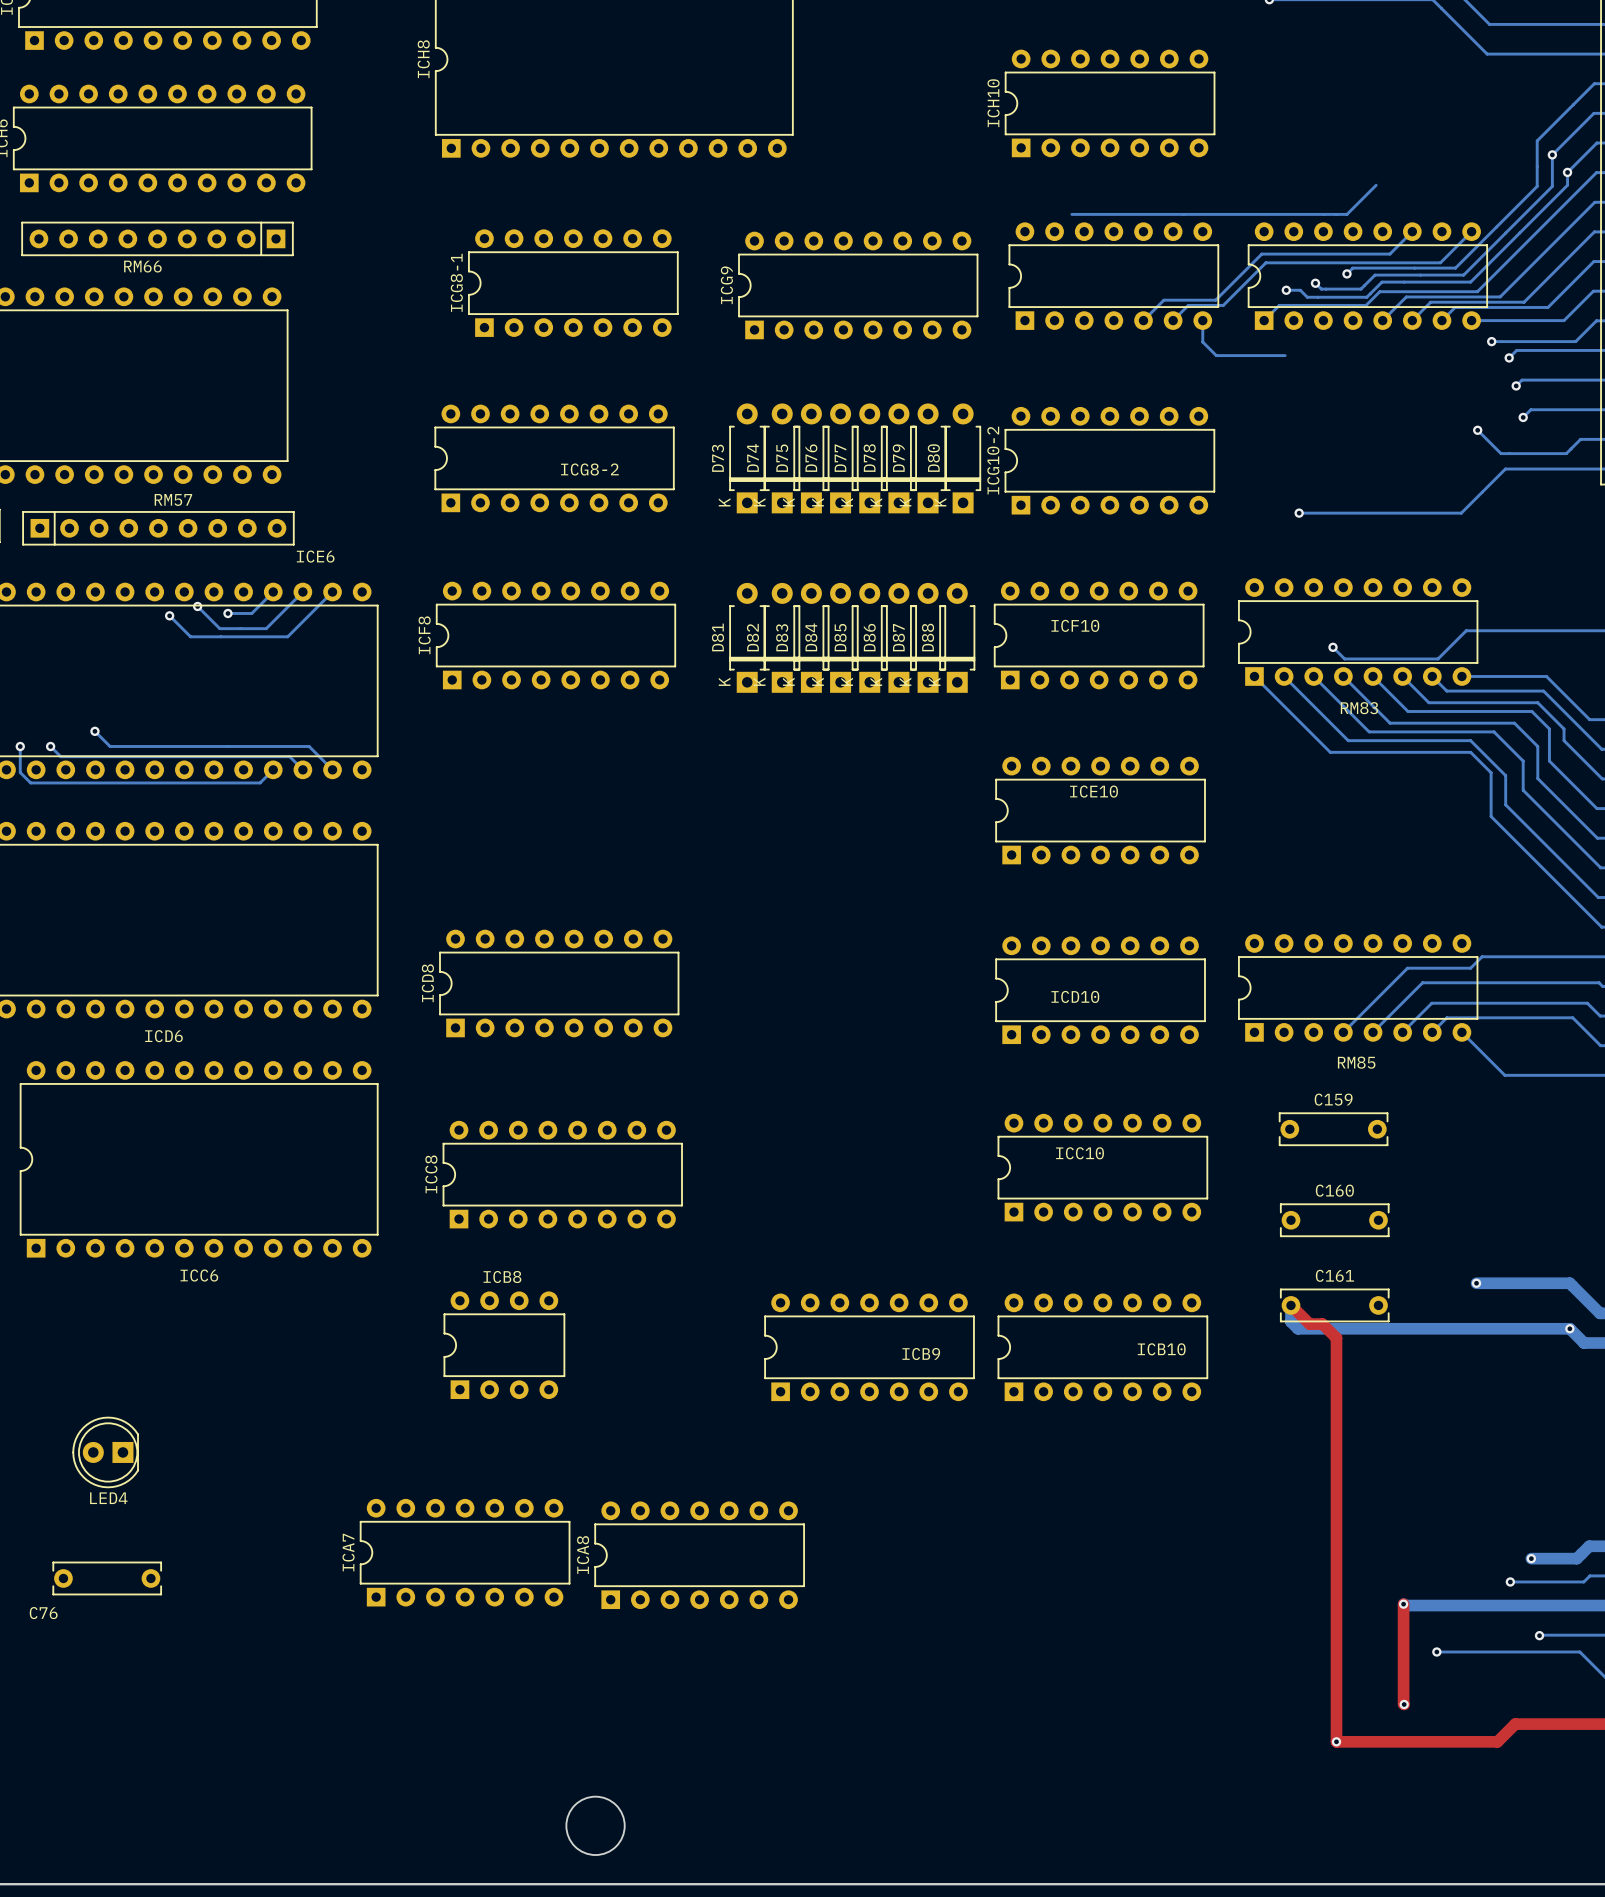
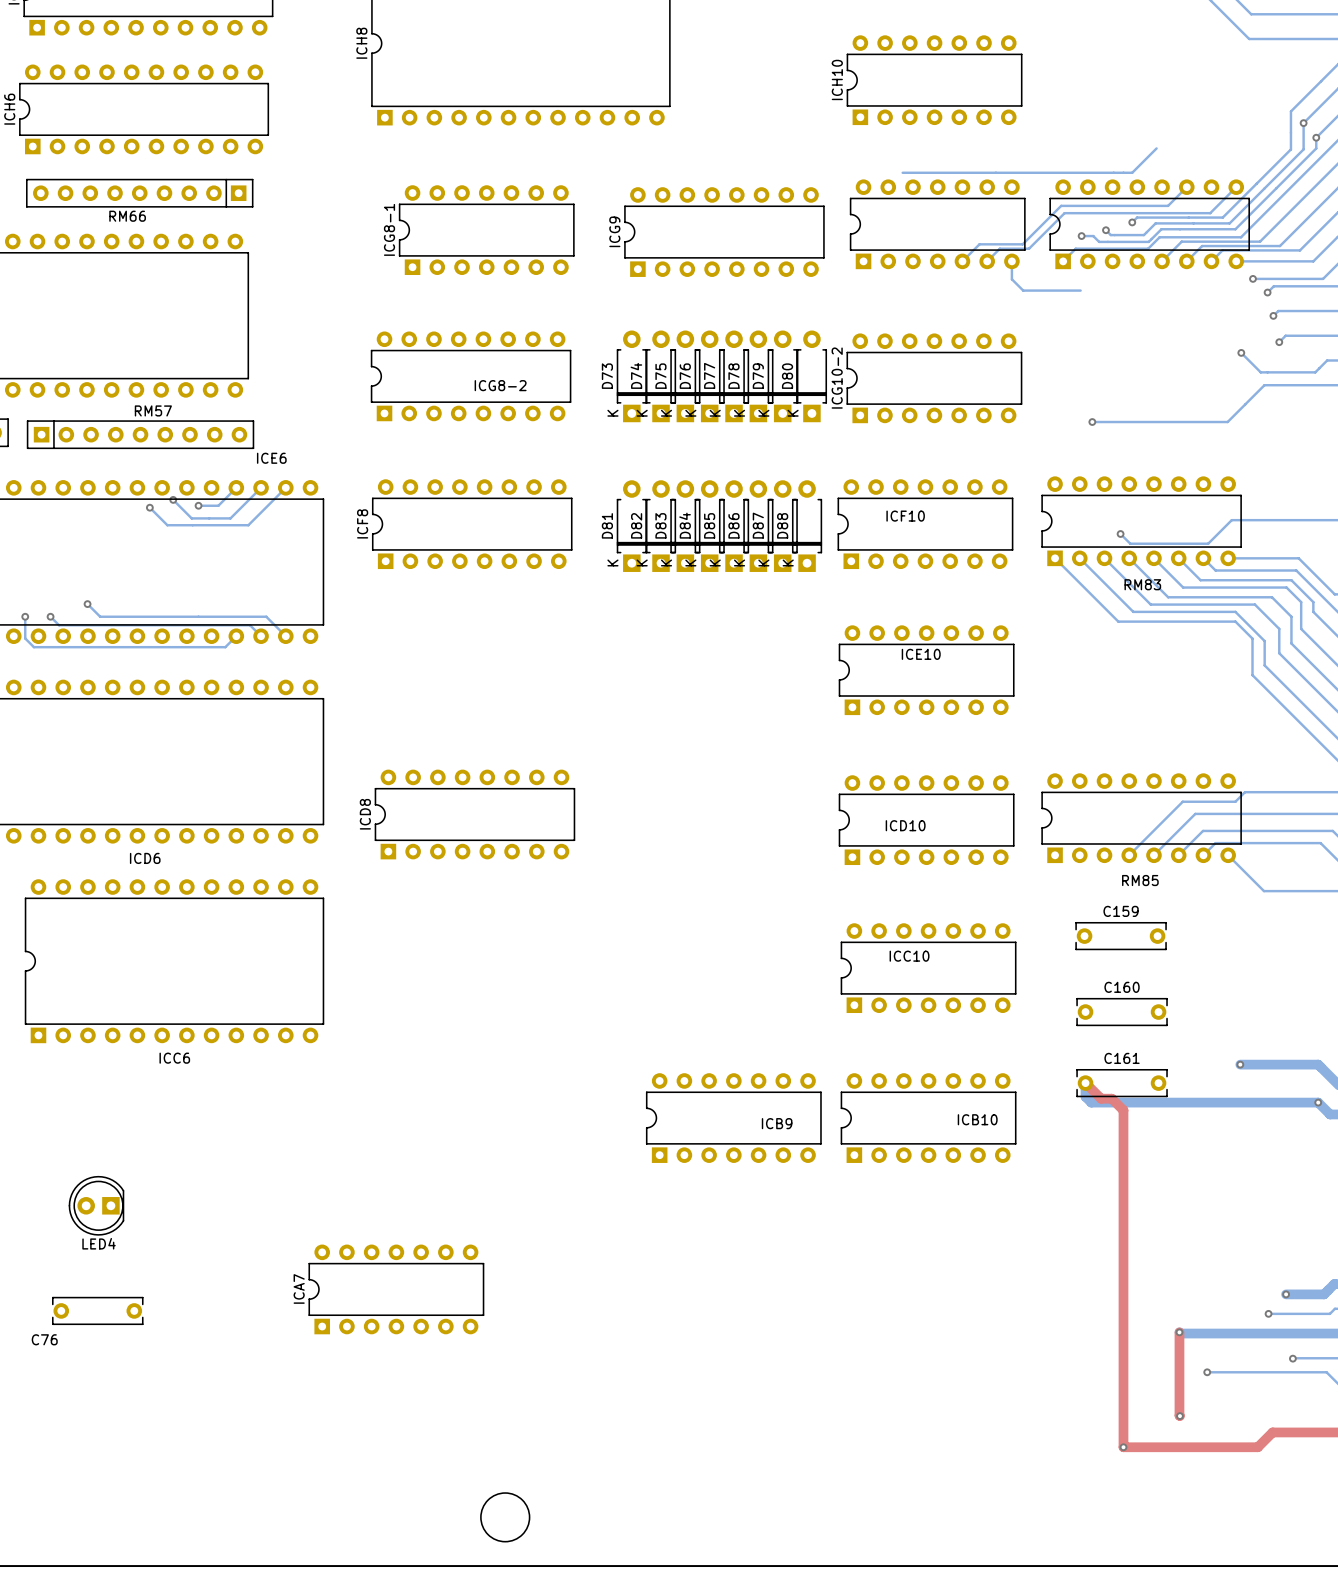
ICC8: (562, 1174) -> none
ICB8: (504, 1345) -> none
ICA8: (699, 1555) -> none

